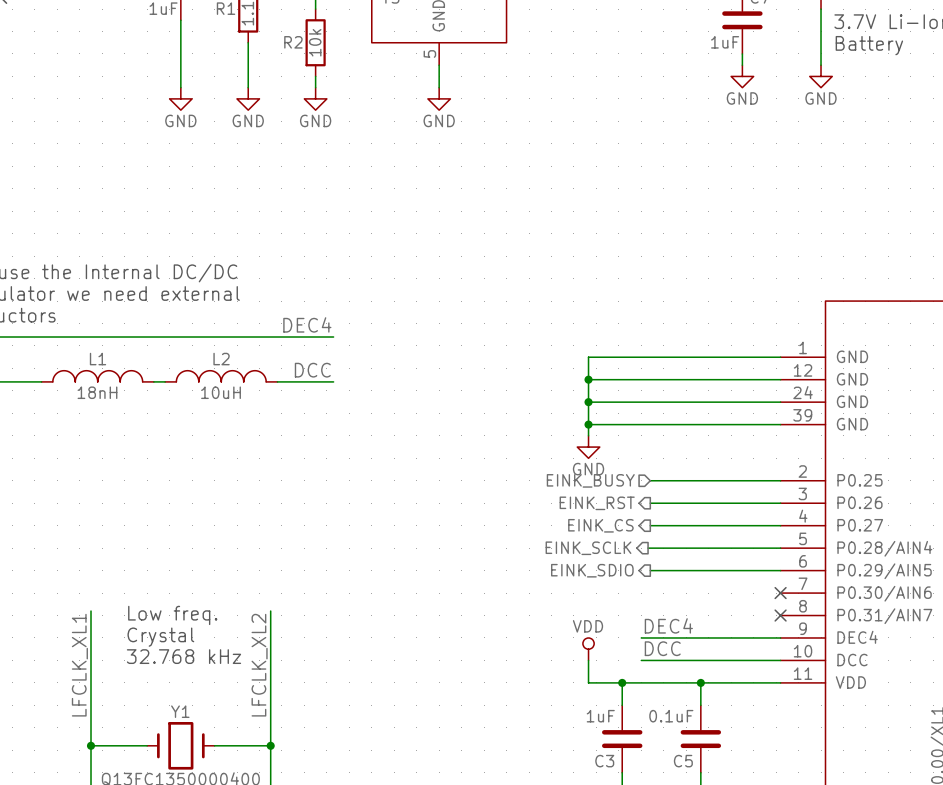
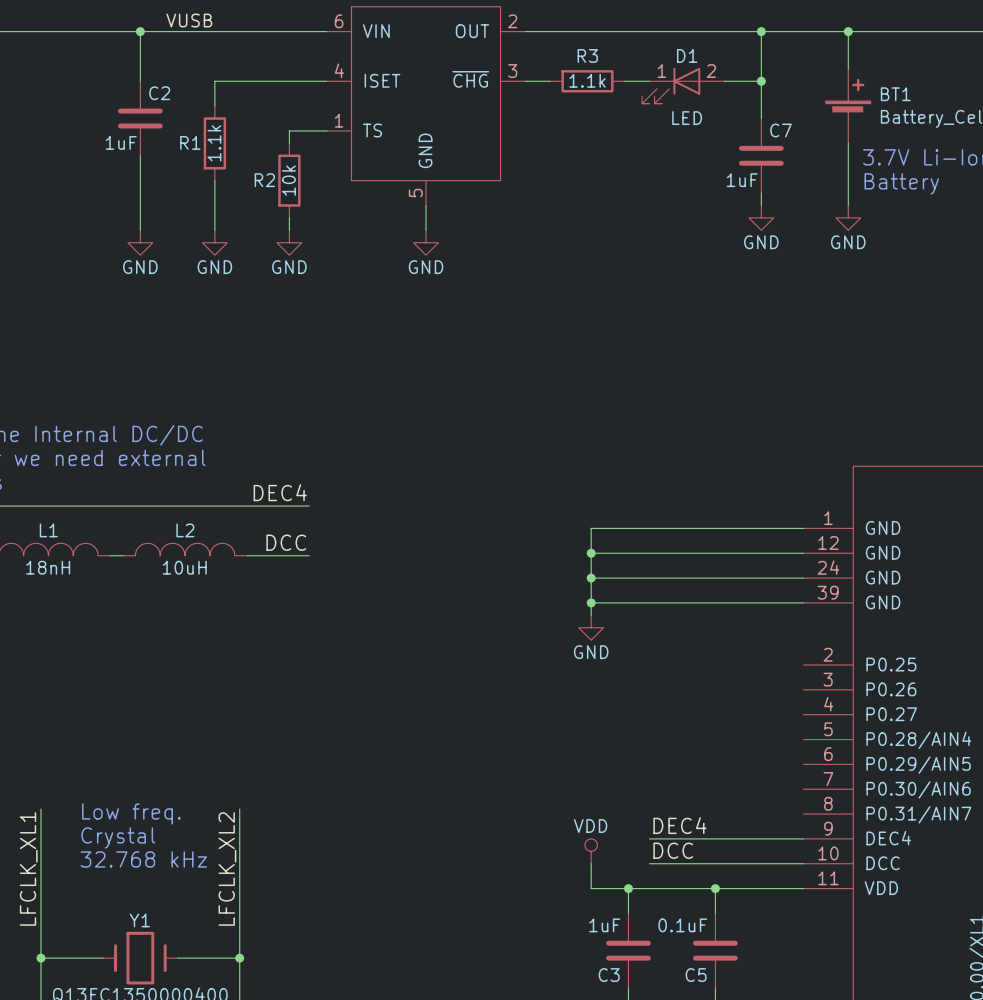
hierarchical label: EINK_BUSY (590, 480) -> none
wire: (650, 480) (780, 480) -> none
hierarchical label: EINK_RST (597, 503) -> none
wire: (650, 503) (780, 503) -> none
hierarchical label: EINK_CS (600, 525) -> none
wire: (650, 525) (780, 525) -> none
hierarchical label: EINK_SCLK (588, 548) -> none
wire: (648, 548) (780, 548) -> none
hierarchical label: EINK_SDIO (592, 570) -> none
wire: (650, 570) (780, 570) -> none
no-connect mark: (780, 593) -> none
no-connect mark: (780, 615) -> none

